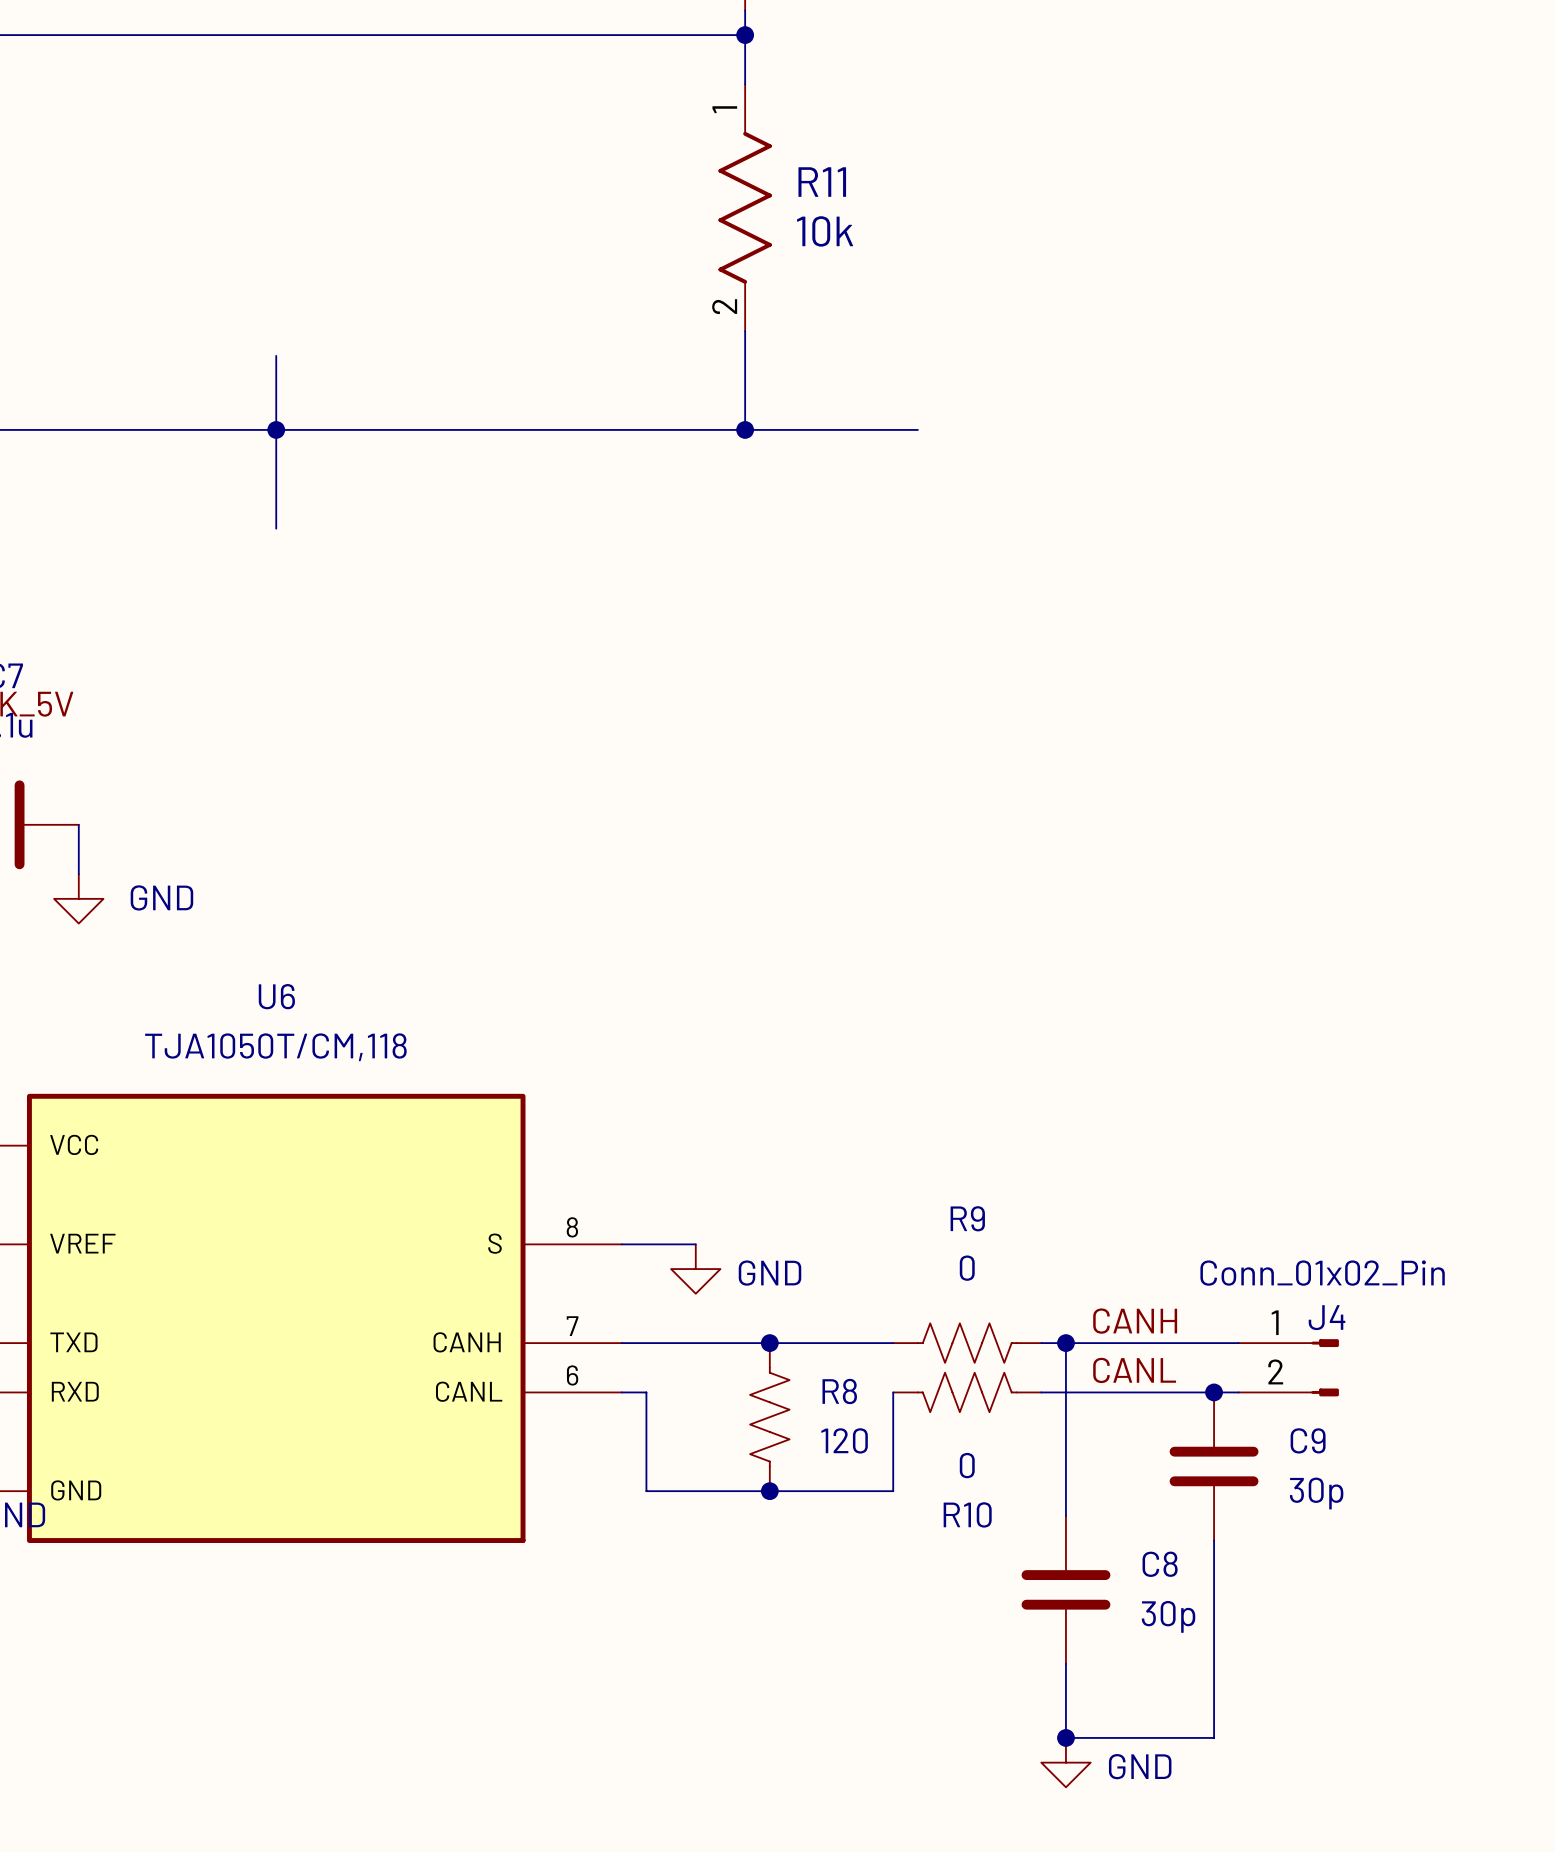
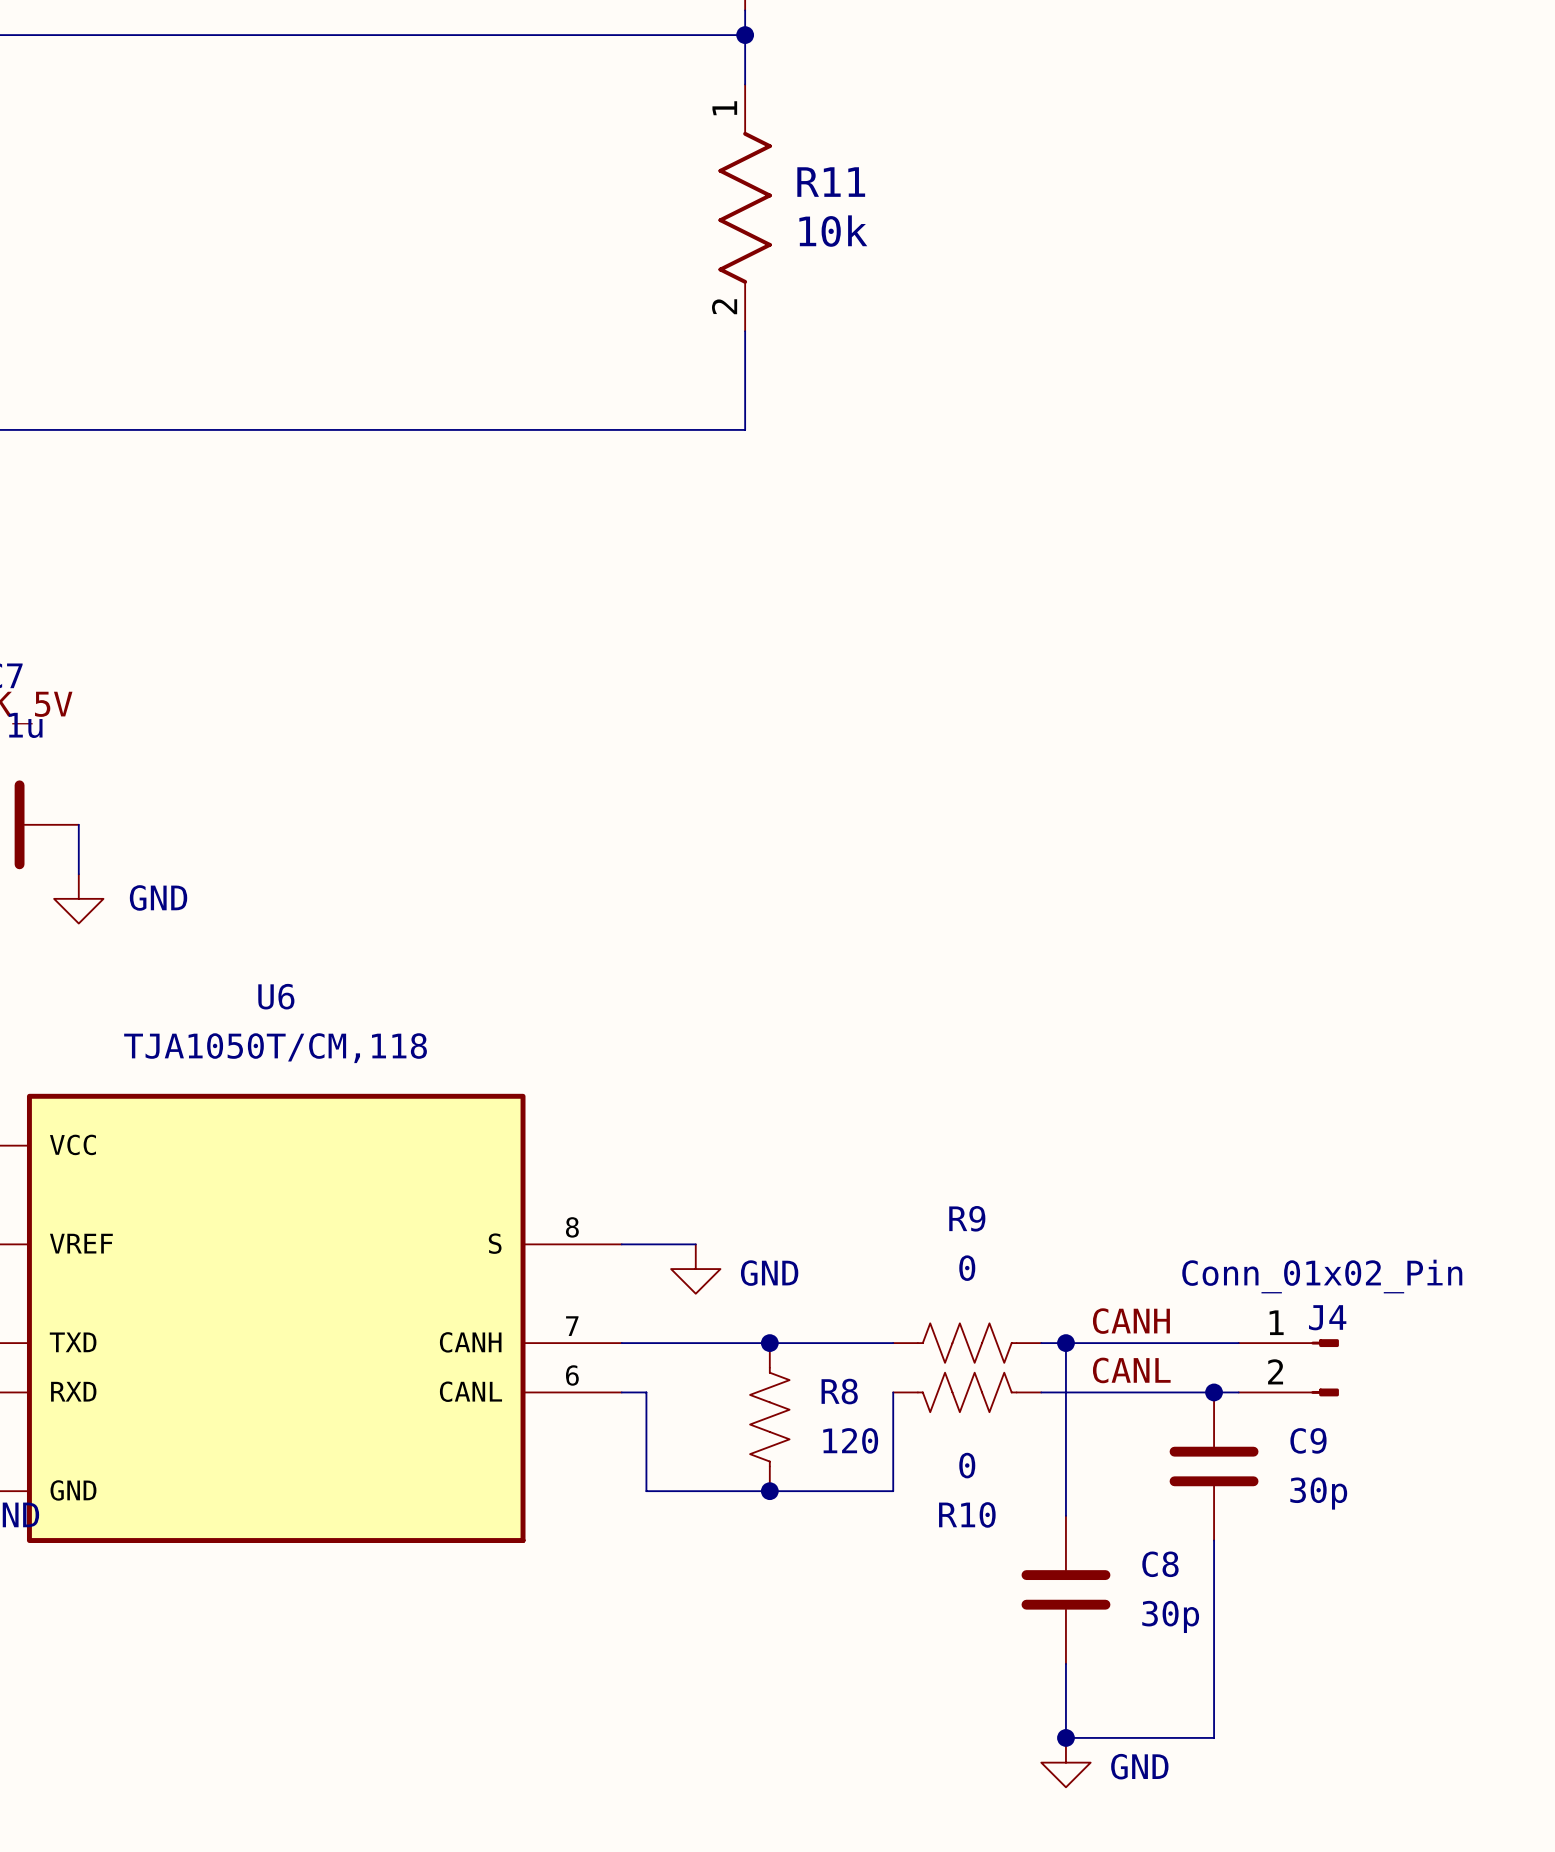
wire: (276, 355) (276, 528) -> none
junction: (276, 429) -> none
wire: (745, 429) (917, 429) -> none
junction: (745, 429) -> none

